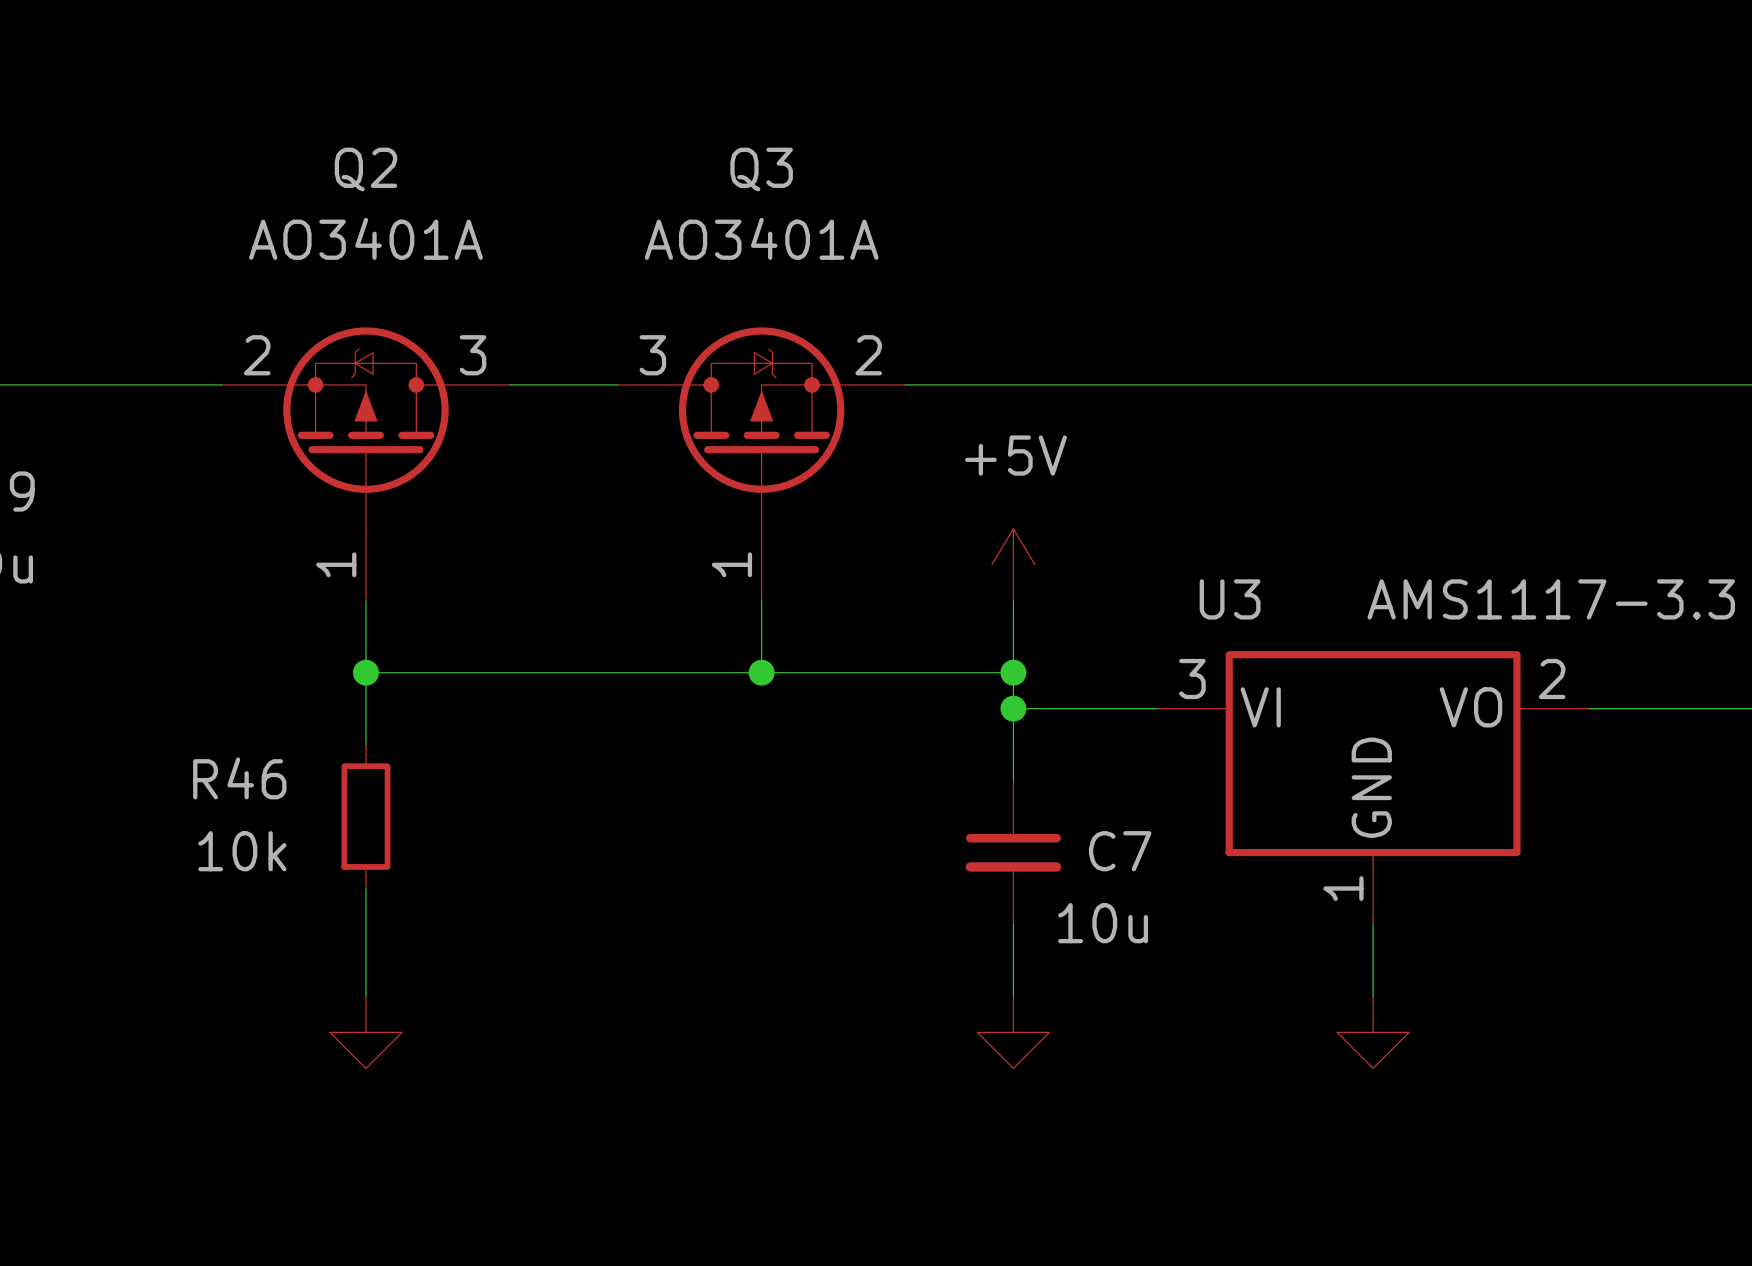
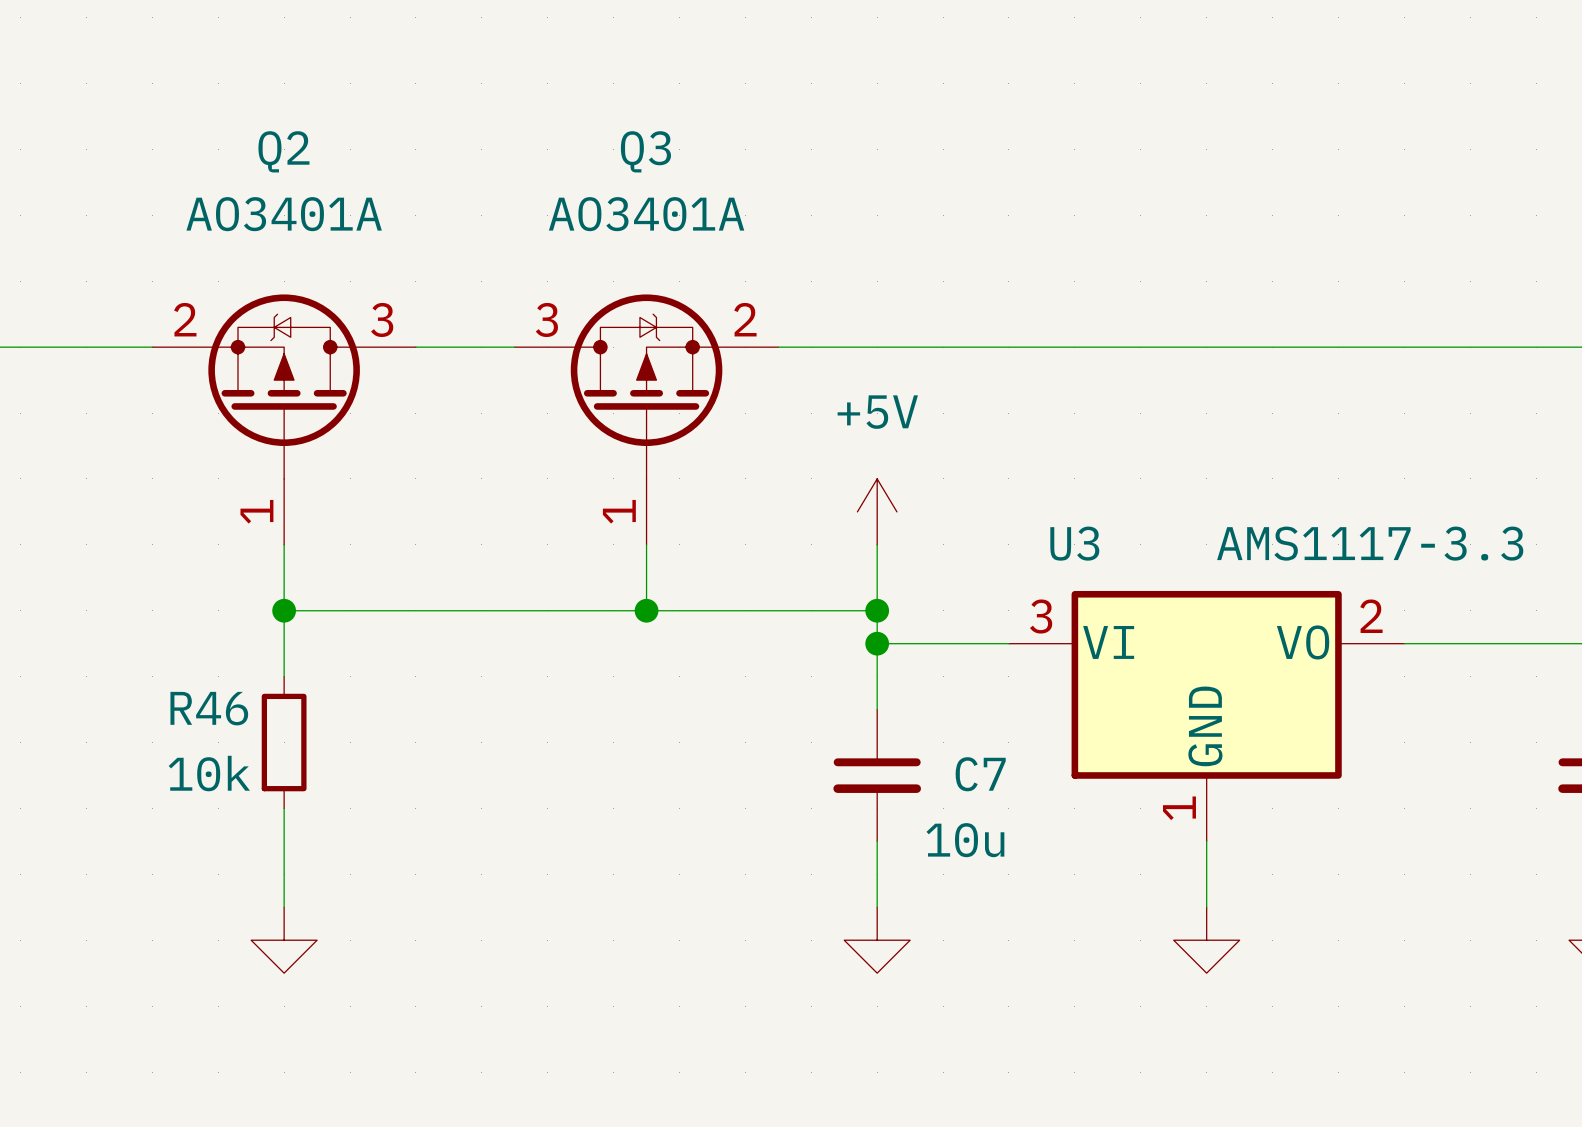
R46 name position: R46 (239, 778) -> R46 (209, 708)
R46 value position: 10k (242, 851) -> 10k (209, 773)

